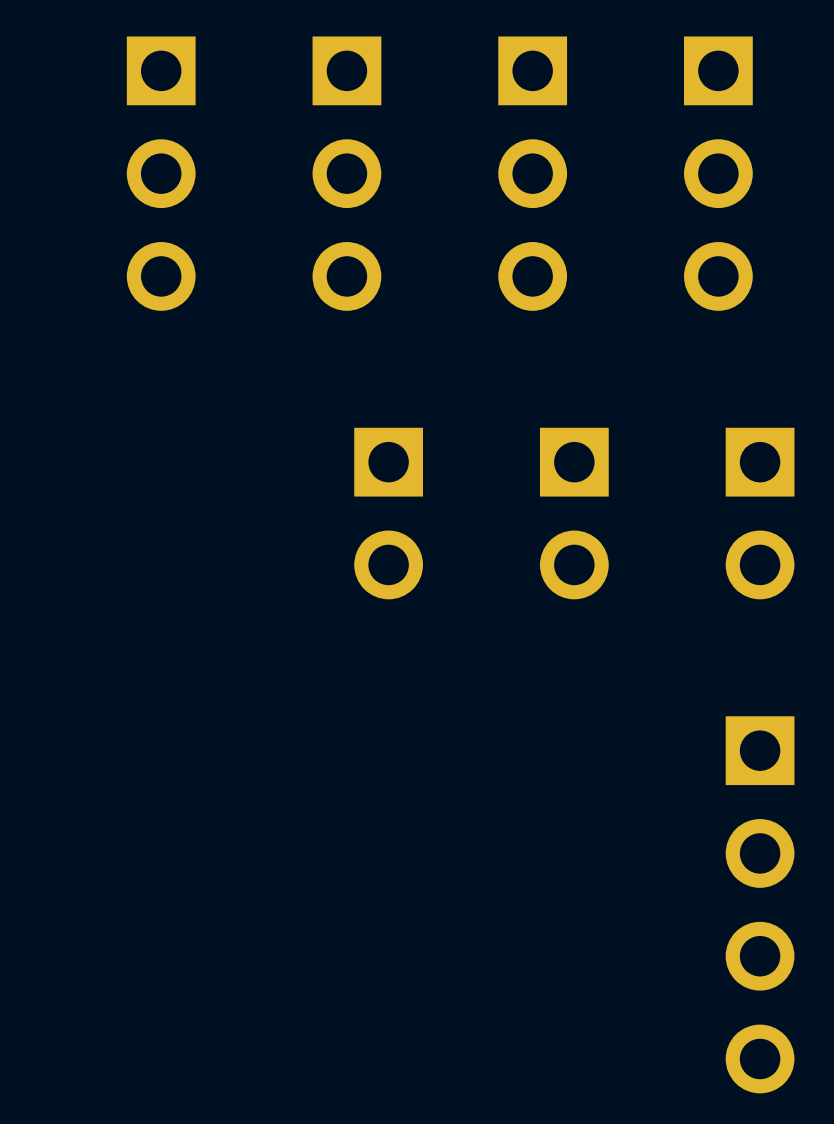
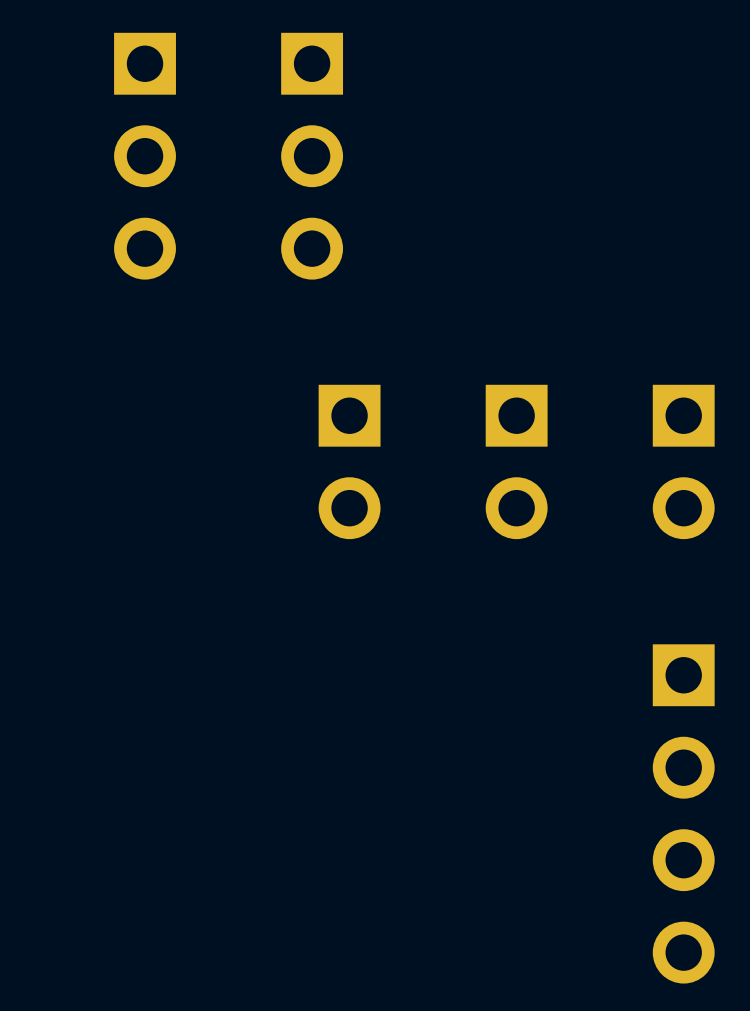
part: (532, 173) -> none
part: (718, 173) -> none

